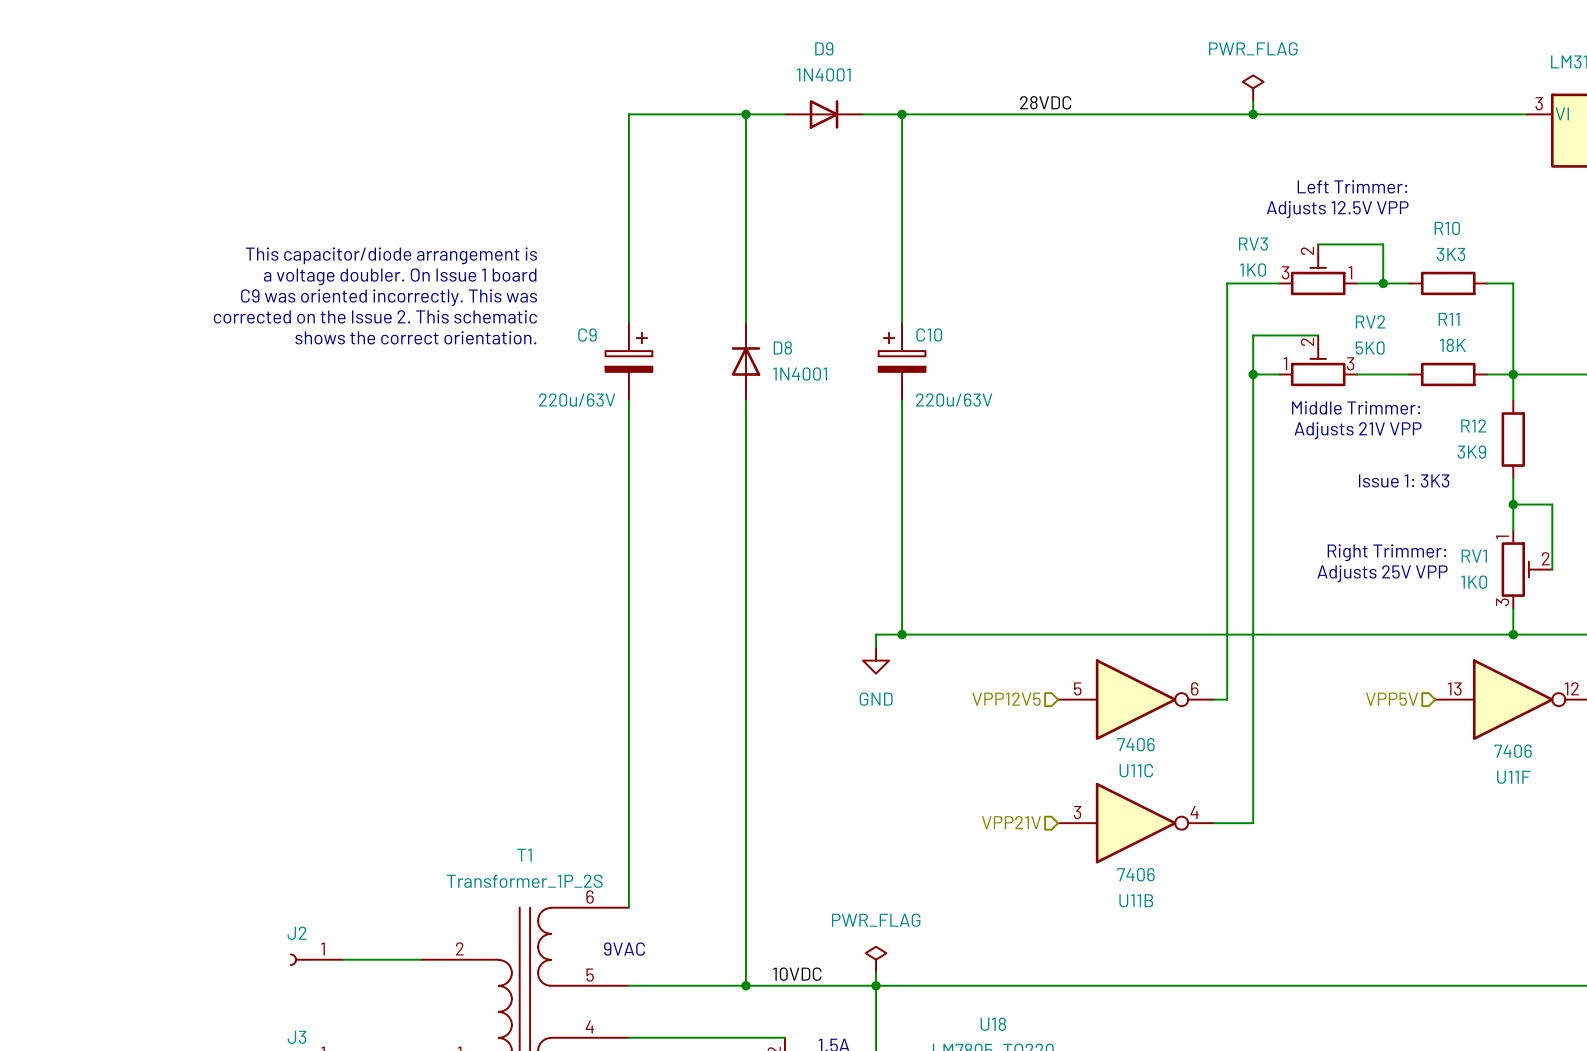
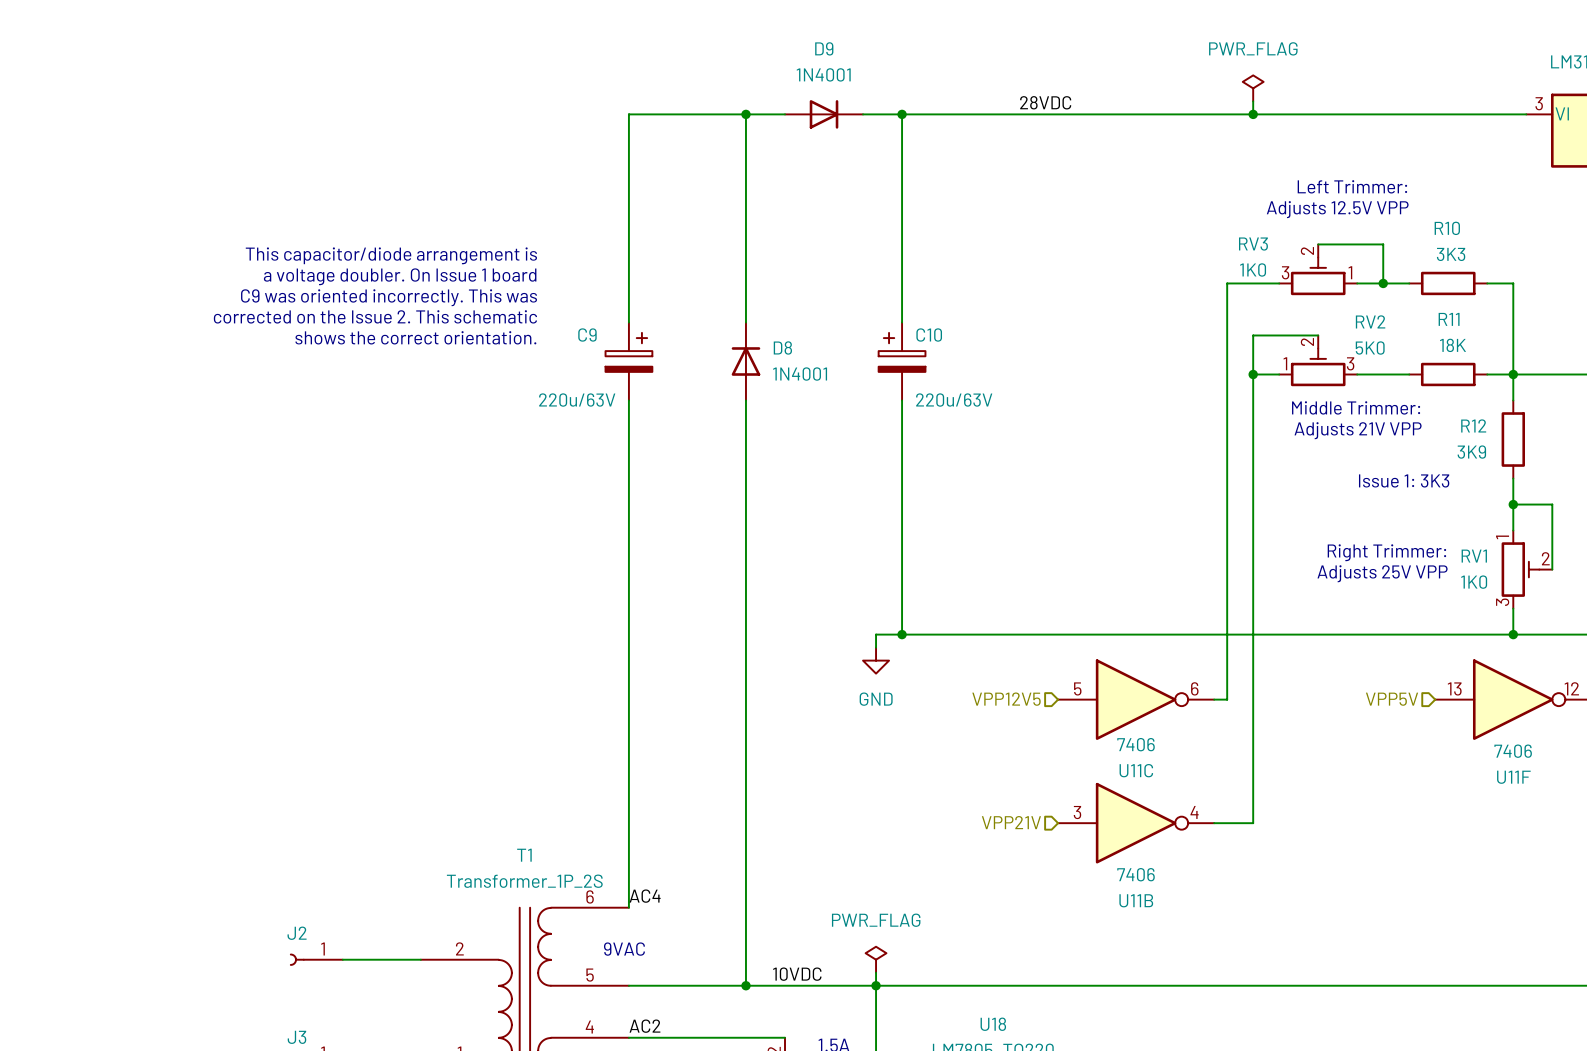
label: none -> AC4 (645, 896)
label: none -> AC2 (644, 1026)

